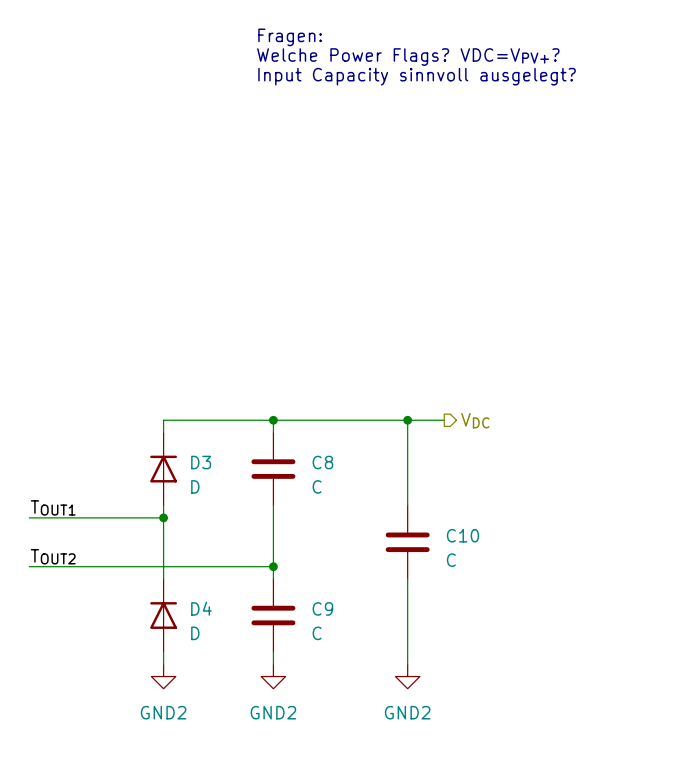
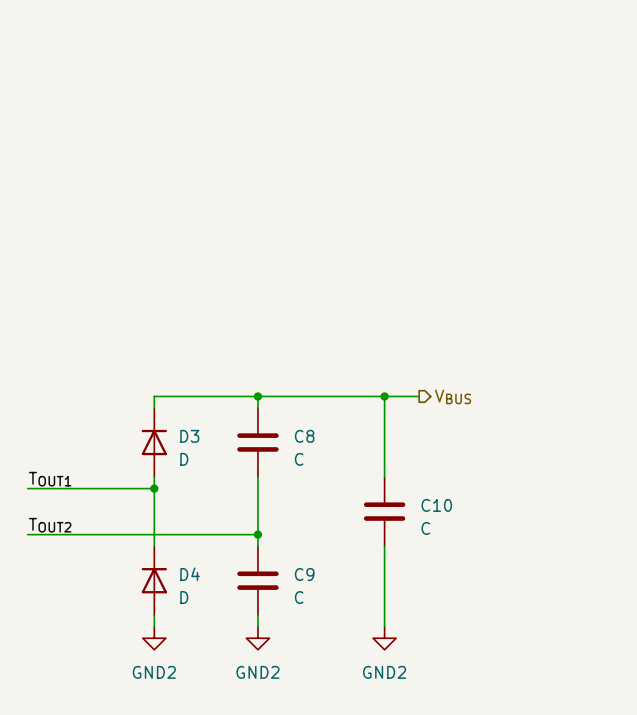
text: Fragen: (290, 37) -> none
text: Welche Power Flags? VDC=VPV+? (408, 57) -> none
text: Input Capacity sinnvoll ausgelegt? (417, 76) -> none
hierarchical label: VDC (475, 420) -> VBUS (453, 396)

